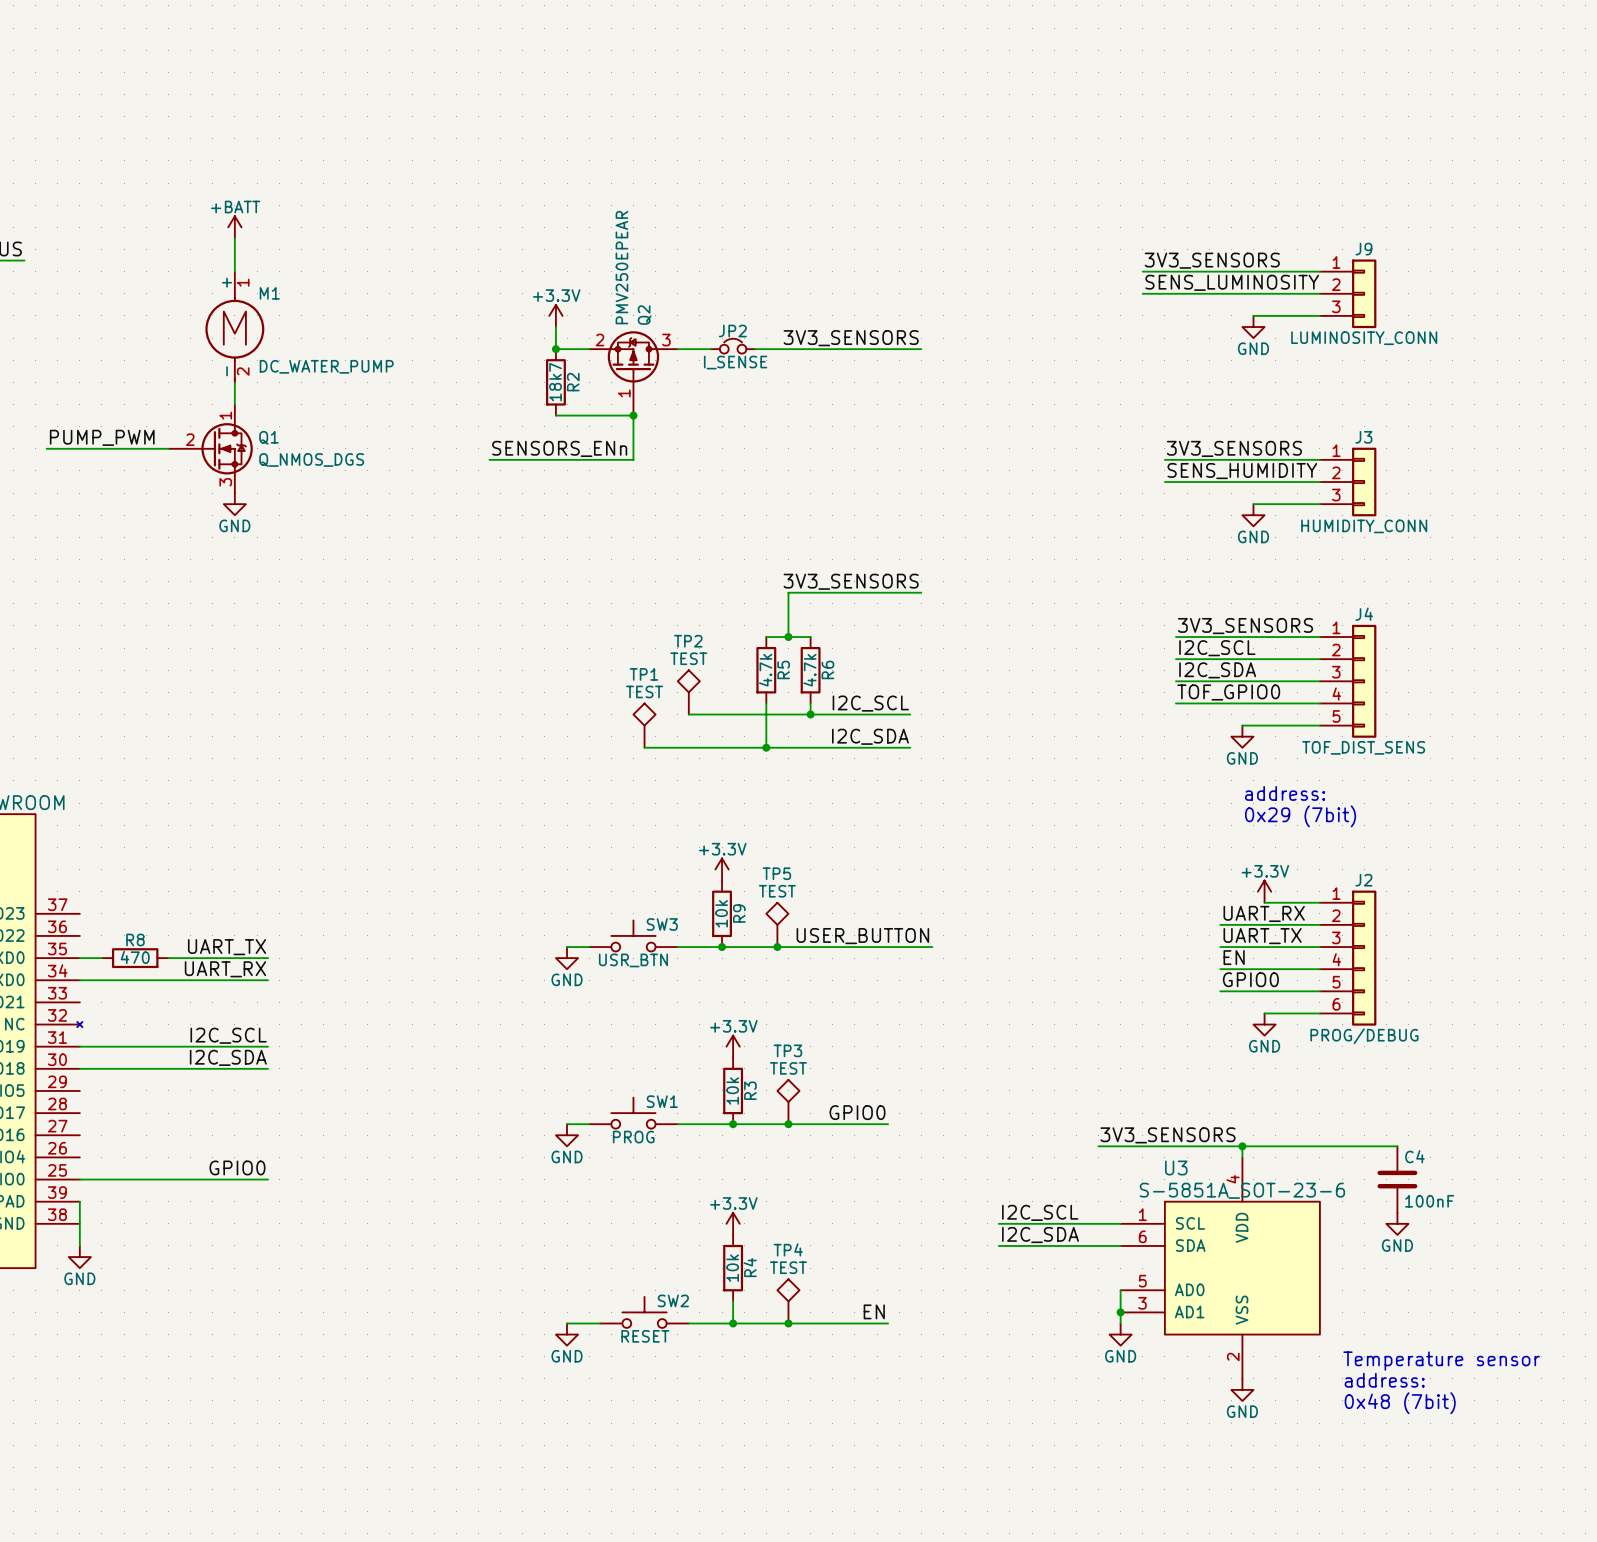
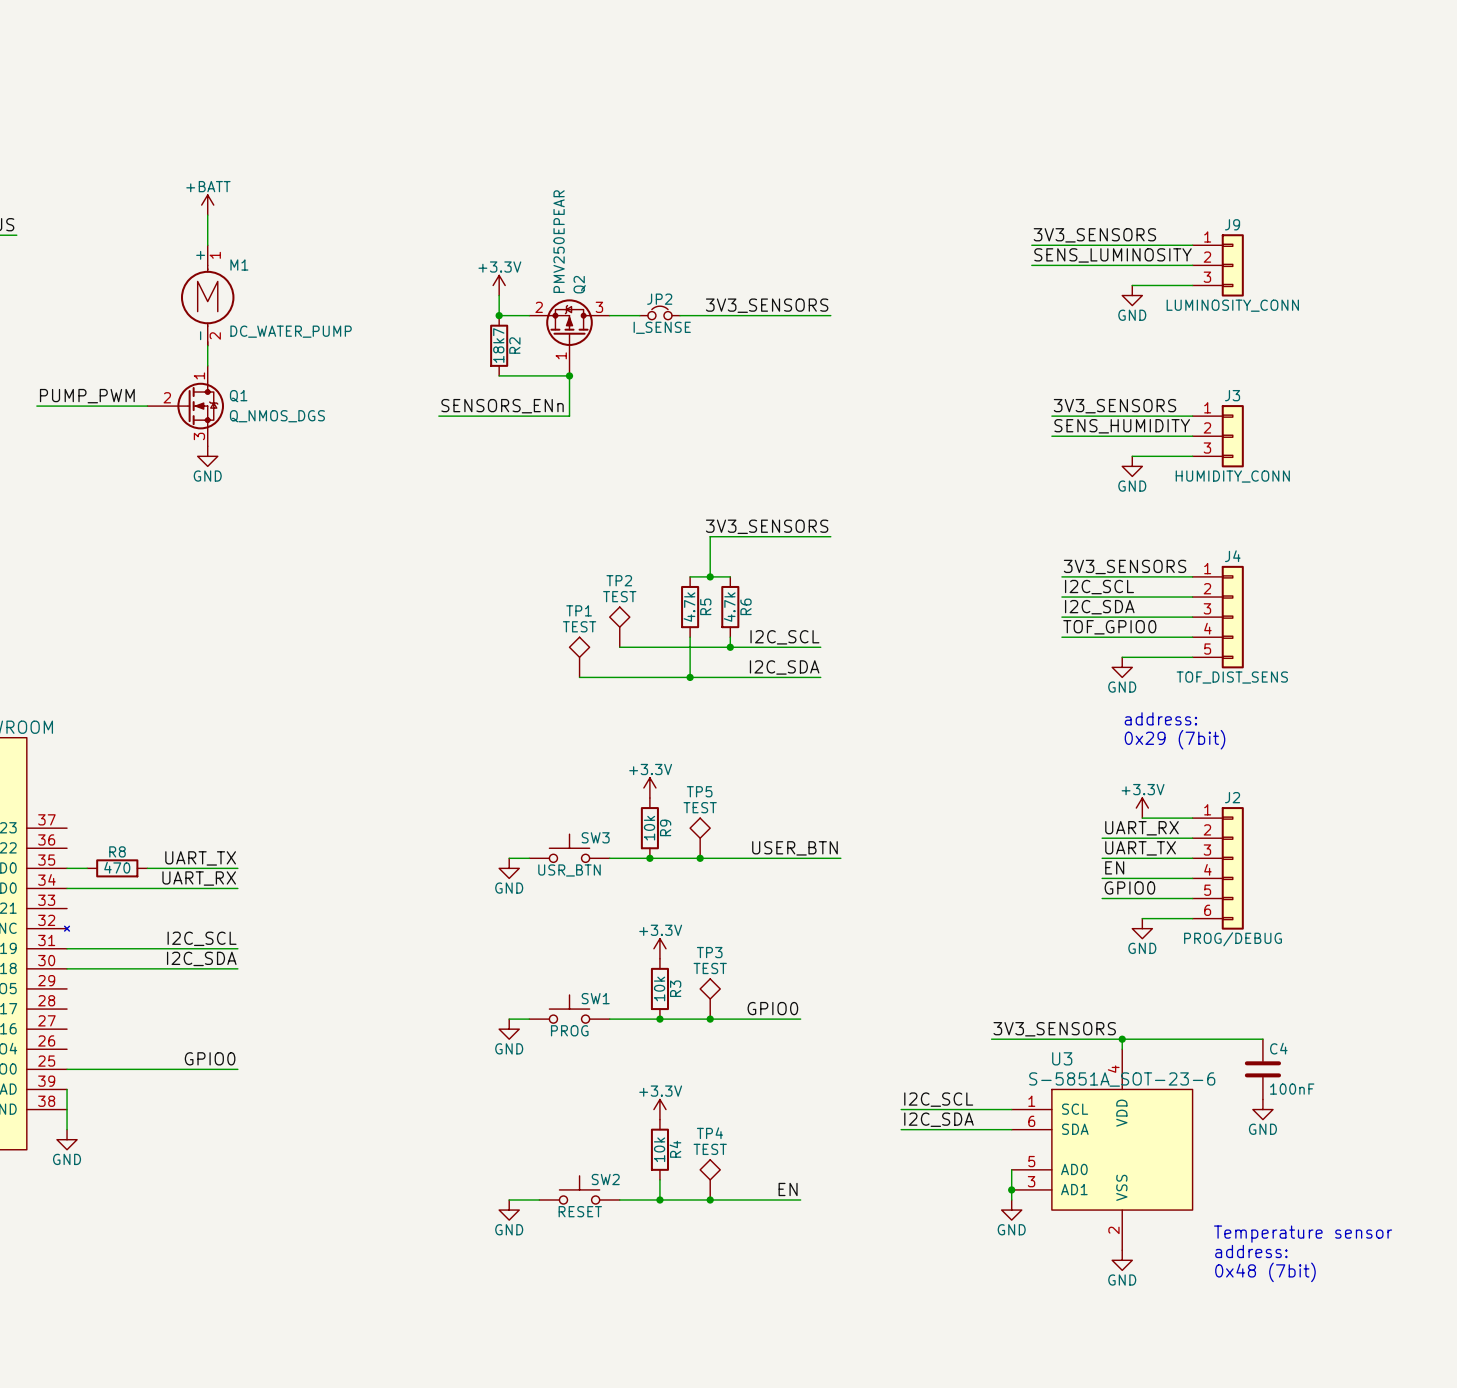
label: USER_BUTTON (862, 936) -> USER_BTN (794, 848)

